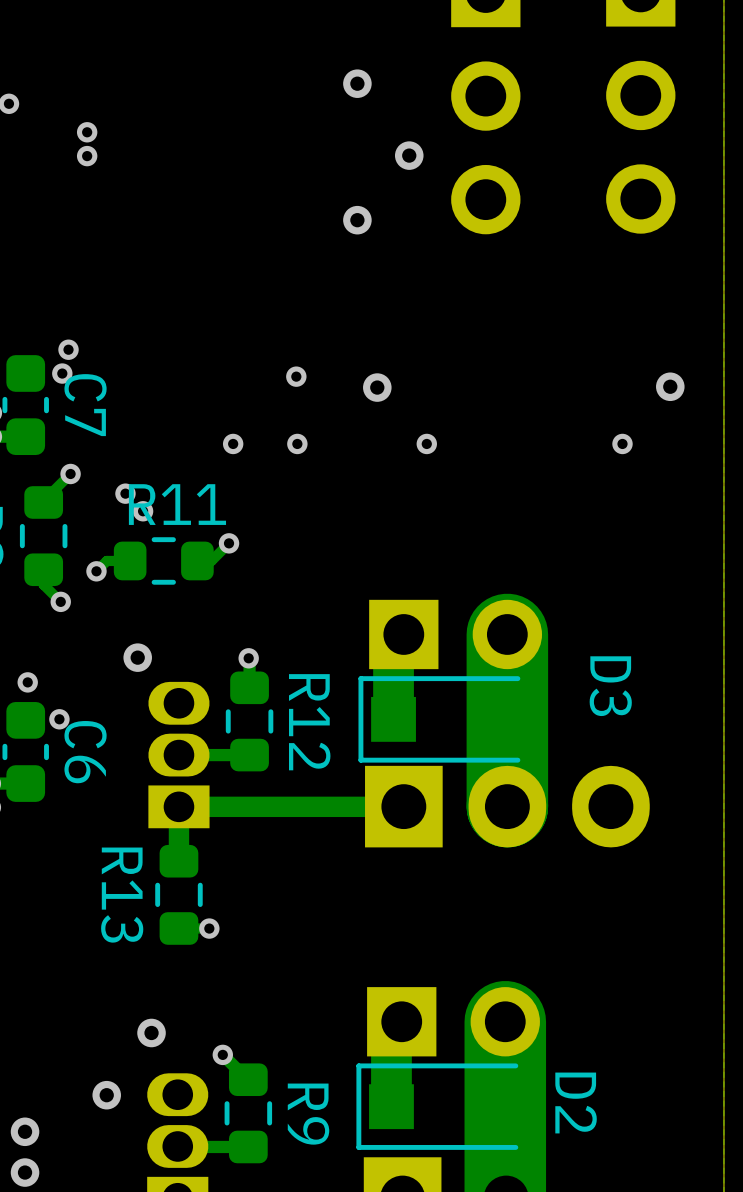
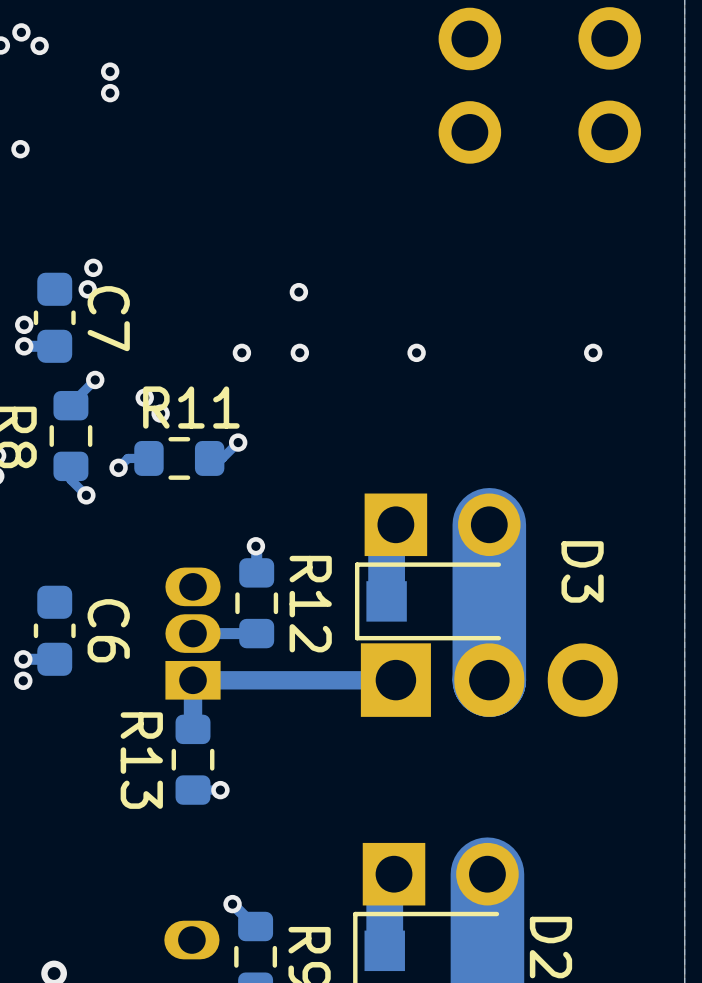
via: (357, 83) -> none
via: (409, 155) -> none
via: (357, 220) -> none
via: (670, 386) -> none
via: (377, 387) -> none
via: (137, 657) -> none
via: (27, 682) -> none
via: (59, 719) -> none
via: (151, 1032) -> none
via: (106, 1095) -> none

